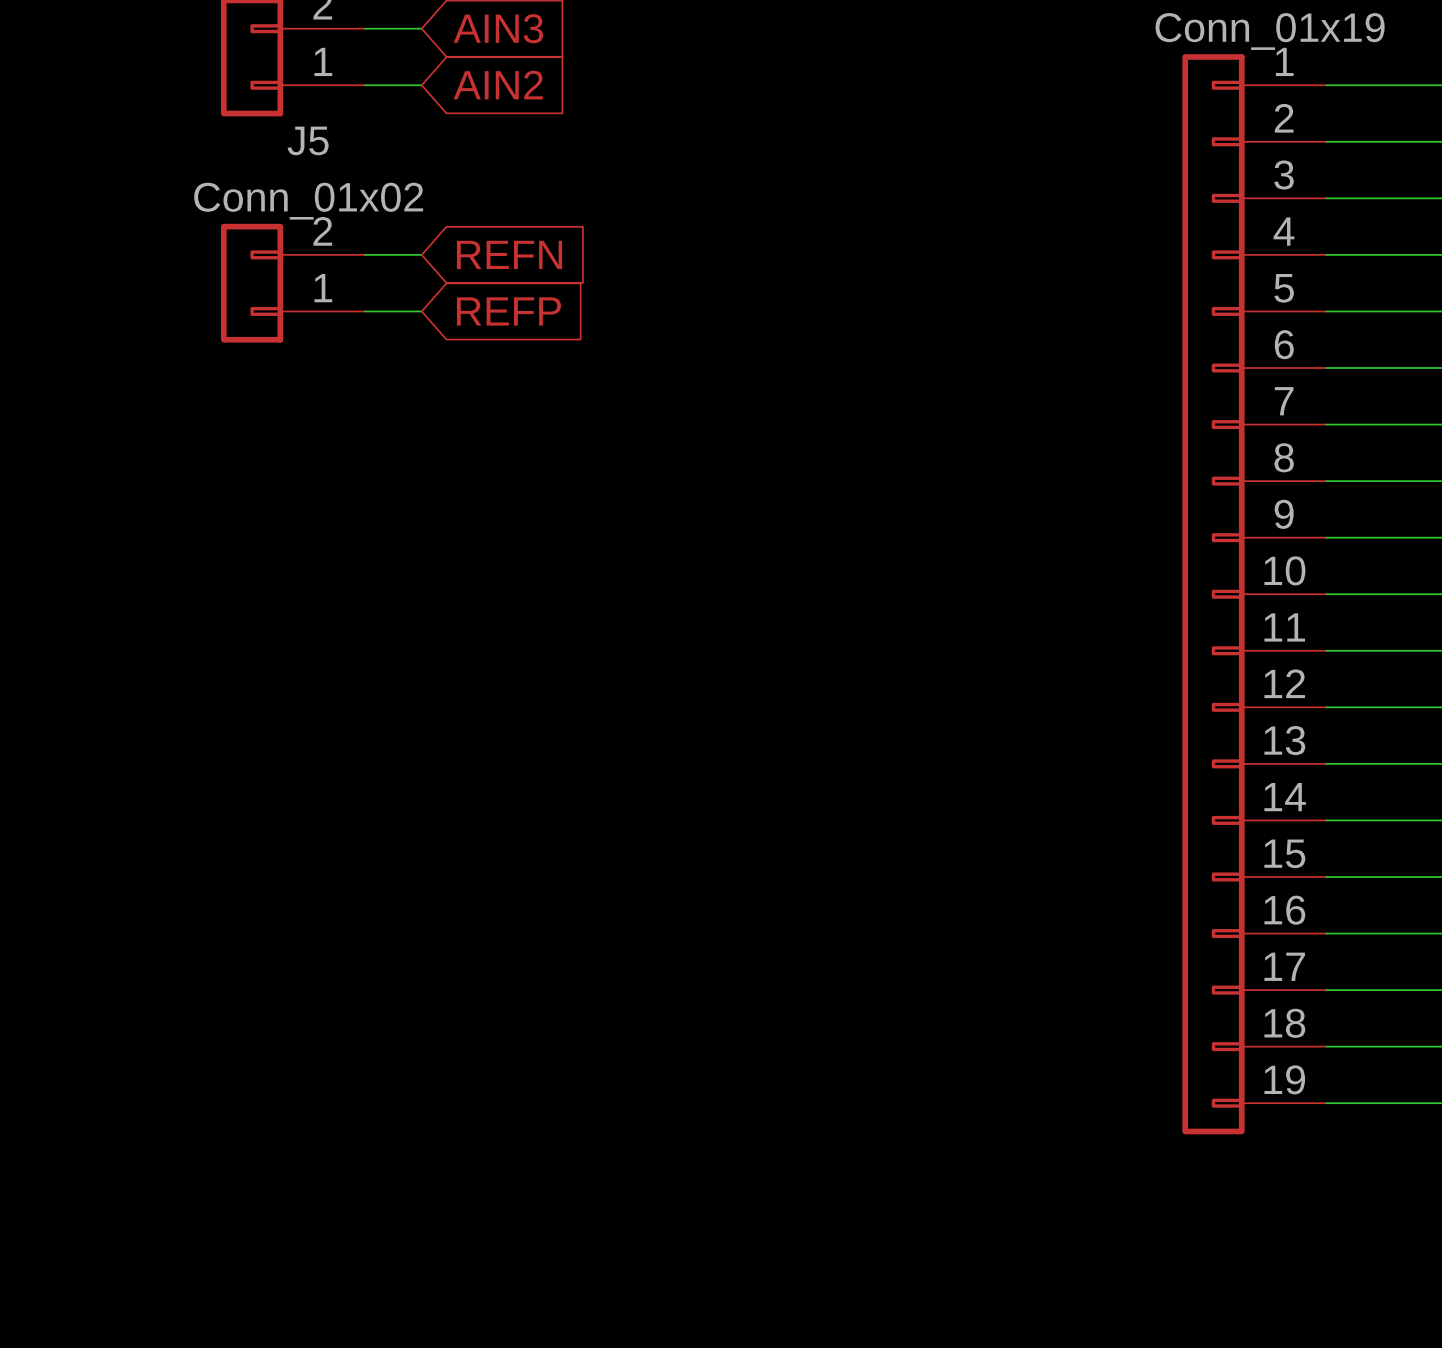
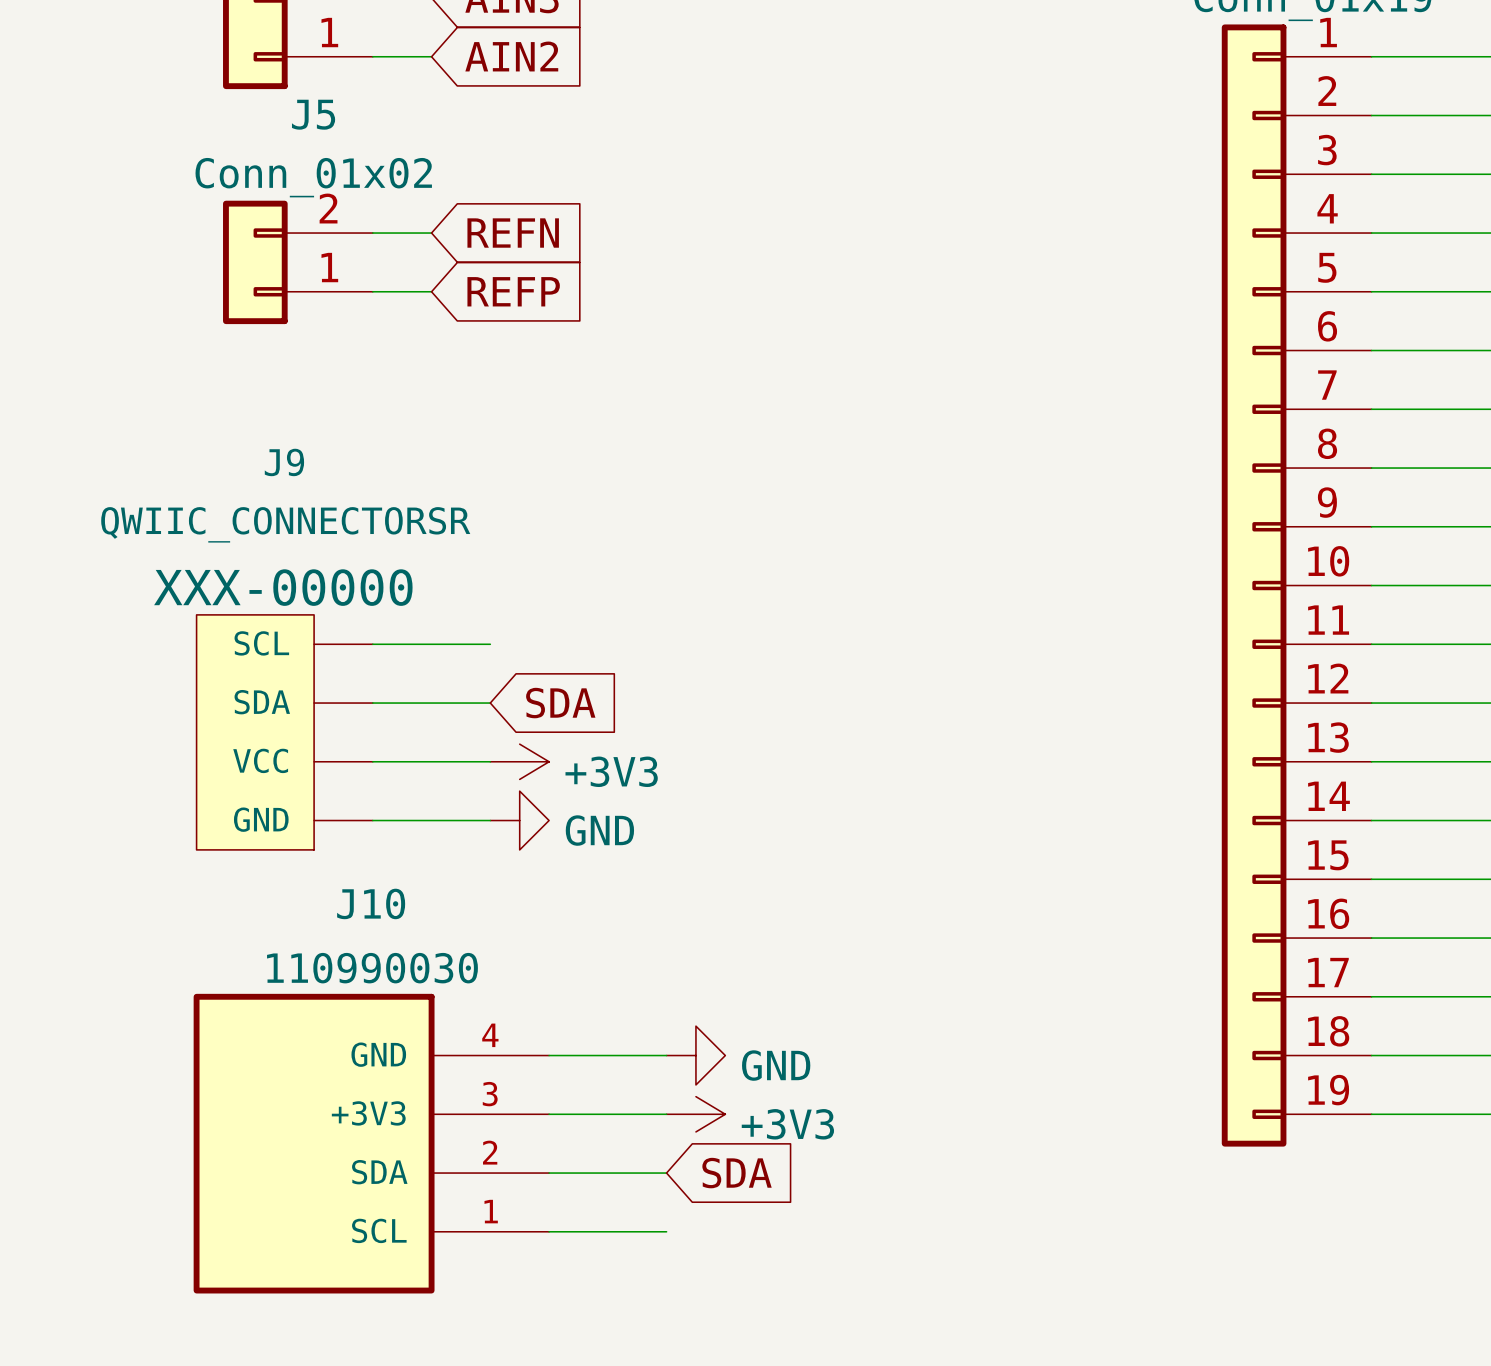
wire: none -> (372, 644) (490, 644)
wire: none -> (372, 703) (490, 703)
global label: none -> SDA (560, 703)
J9: none -> QWIIC_CONNECTORSR (284, 732)
wire: none -> (372, 761) (490, 761)
power symbol: none -> +3V3 (519, 761)
wire: none -> (372, 820) (490, 820)
power symbol: none -> GND (519, 820)
wire: none -> (549, 1055) (666, 1055)
power symbol: none -> GND (695, 1055)
wire: none -> (549, 1114) (666, 1114)
power symbol: none -> +3V3 (695, 1114)
J10: none -> 110990030 (371, 1143)
wire: none -> (549, 1173) (666, 1173)
global label: none -> SDA (737, 1173)
wire: none -> (549, 1231) (666, 1231)

